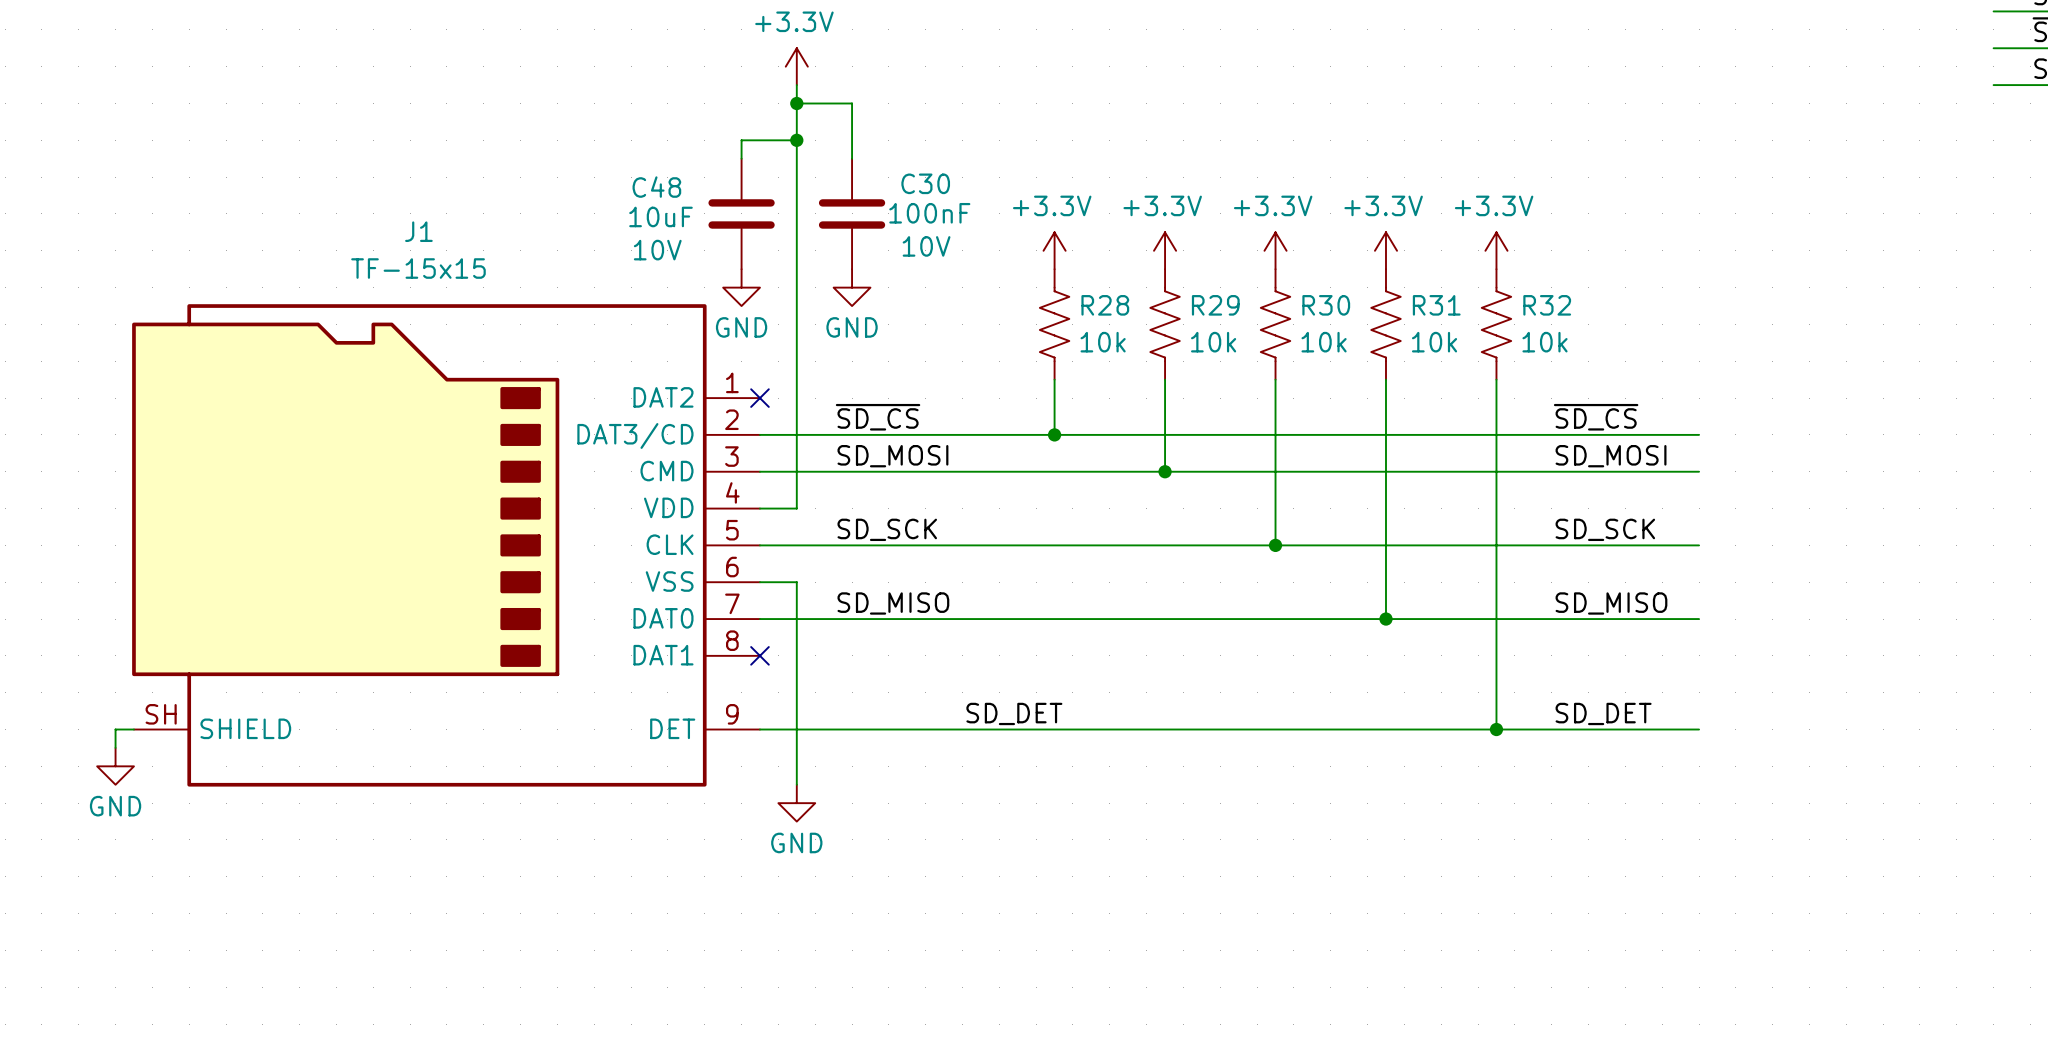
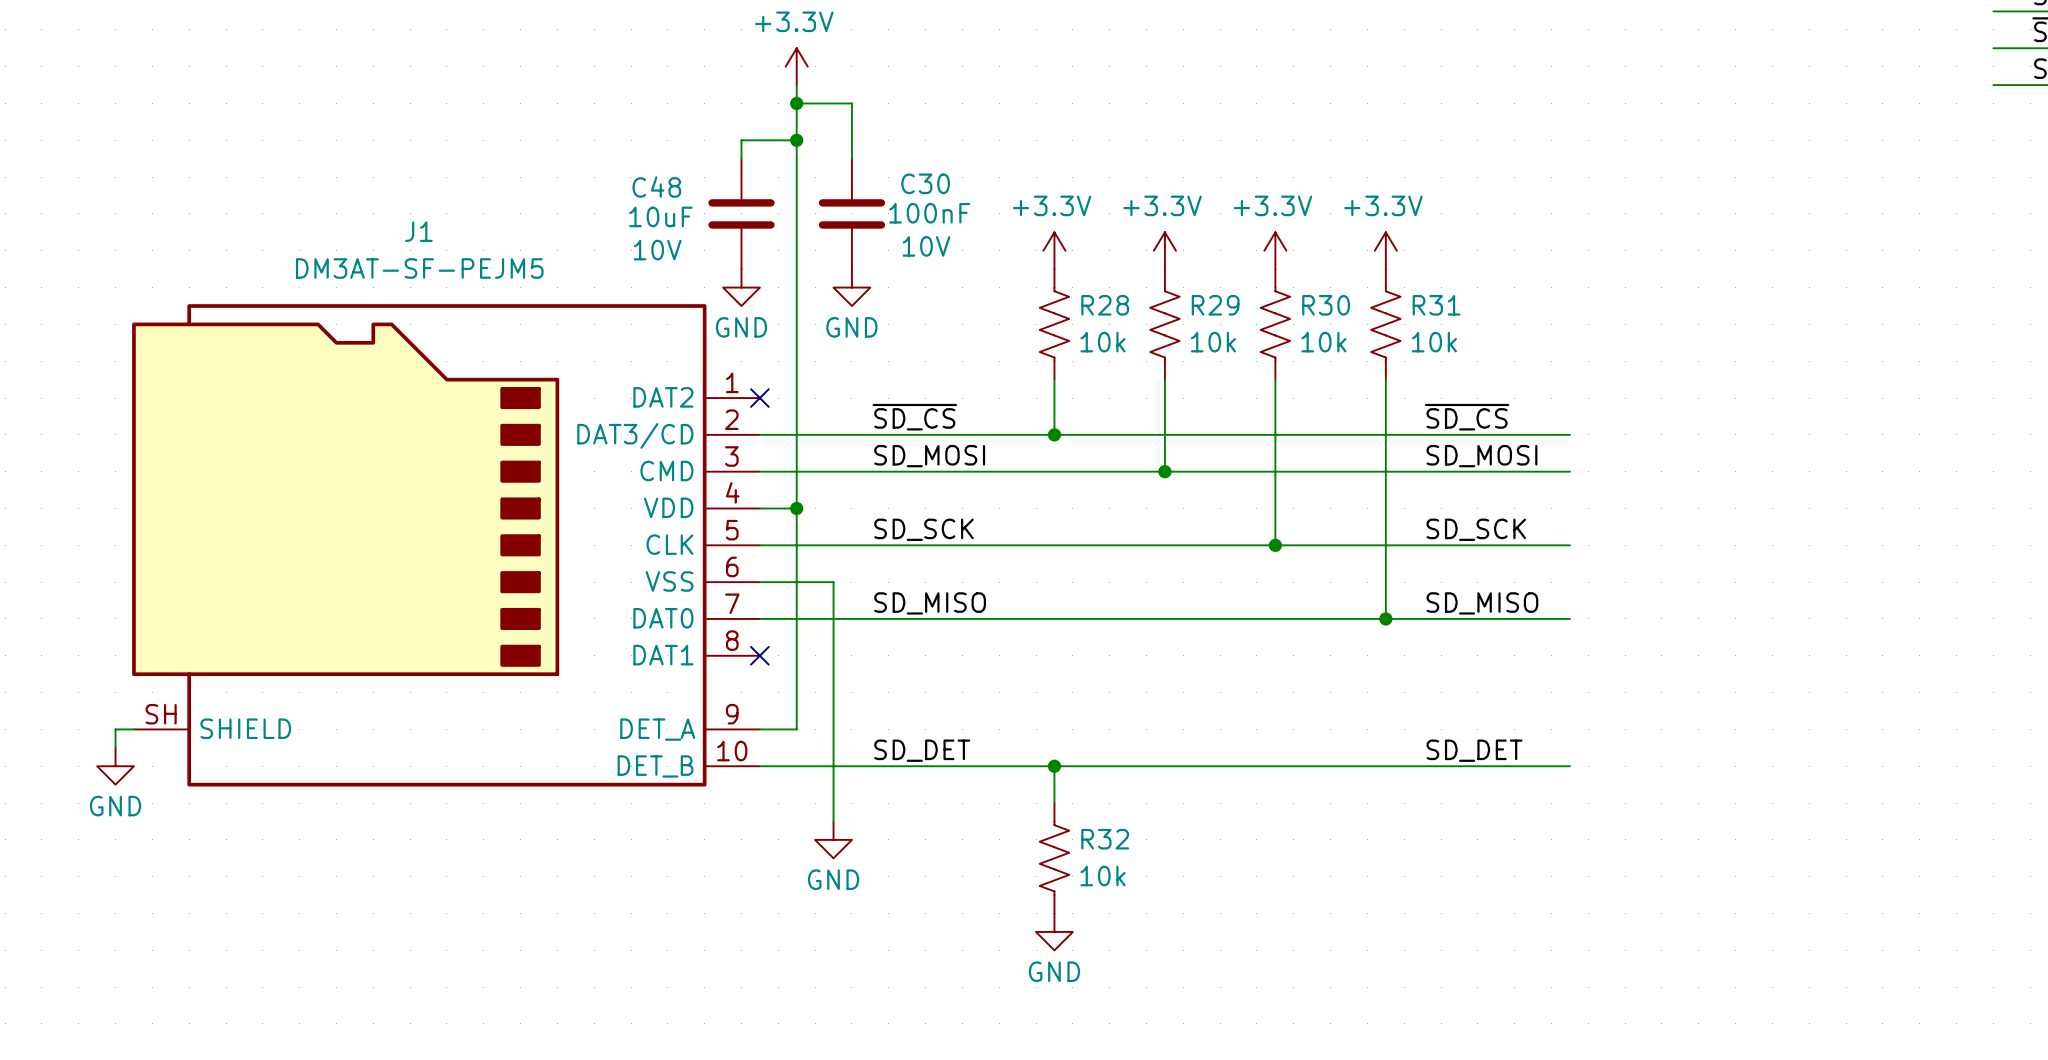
power symbol: +3.3V (1496, 250) -> none
J1 value: TF-15x15 (418, 268) -> DM3AT-SF-PEJM5 (419, 268)
J1 symbol: [132, 304, 760, 787] -> [132, 304, 760, 787]
R32 position: (1496, 324) -> (1054, 858)
wire: (1496, 379) (1496, 729) -> none
label position: ~{SD_CS} (878, 417) -> ~{SD_CS} (914, 417)
label position: ~{SD_CS} (1596, 417) -> ~{SD_CS} (1467, 417)
wire: (1570, 434) (1699, 434) -> none
label position: SD_MOSI (892, 456) -> SD_MOSI (929, 456)
label position: SD_MOSI (1611, 456) -> SD_MOSI (1481, 456)
wire: (1570, 471) (1699, 471) -> none
wire: none -> (796, 508) (796, 582) (833, 582) (833, 821)
junction: none -> (796, 508)
label position: SD_SCK (887, 529) -> SD_SCK (923, 529)
label position: SD_SCK (1605, 529) -> SD_SCK (1476, 529)
wire: (1570, 545) (1699, 545) -> none
label position: SD_MISO (893, 603) -> SD_MISO (930, 603)
label position: SD_MISO (1611, 603) -> SD_MISO (1482, 603)
wire: (1570, 619) (1699, 619) -> none
label position: SD_DET (1014, 713) -> SD_DET (922, 750)
label position: SD_DET (1603, 713) -> SD_DET (1474, 750)
junction: (1496, 729) -> none
wire: (1699, 729) (796, 729) (796, 784) -> none
wire: none -> (759, 766) (1569, 766)
wire: none -> (1054, 766) (1054, 803)
junction: none -> (1054, 766)
power symbol position: GND (796, 803) -> GND (833, 839)
power symbol: none -> GND (1054, 931)

